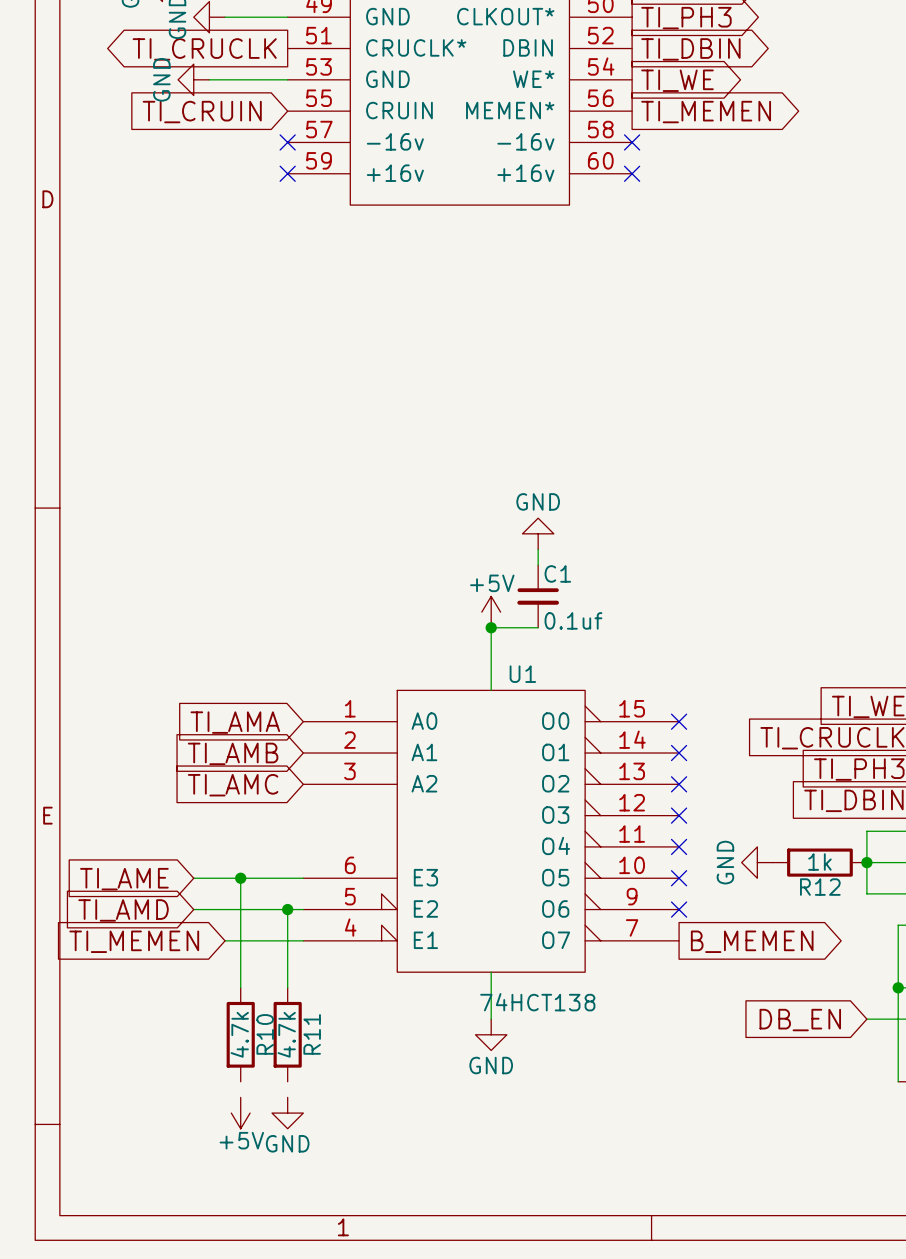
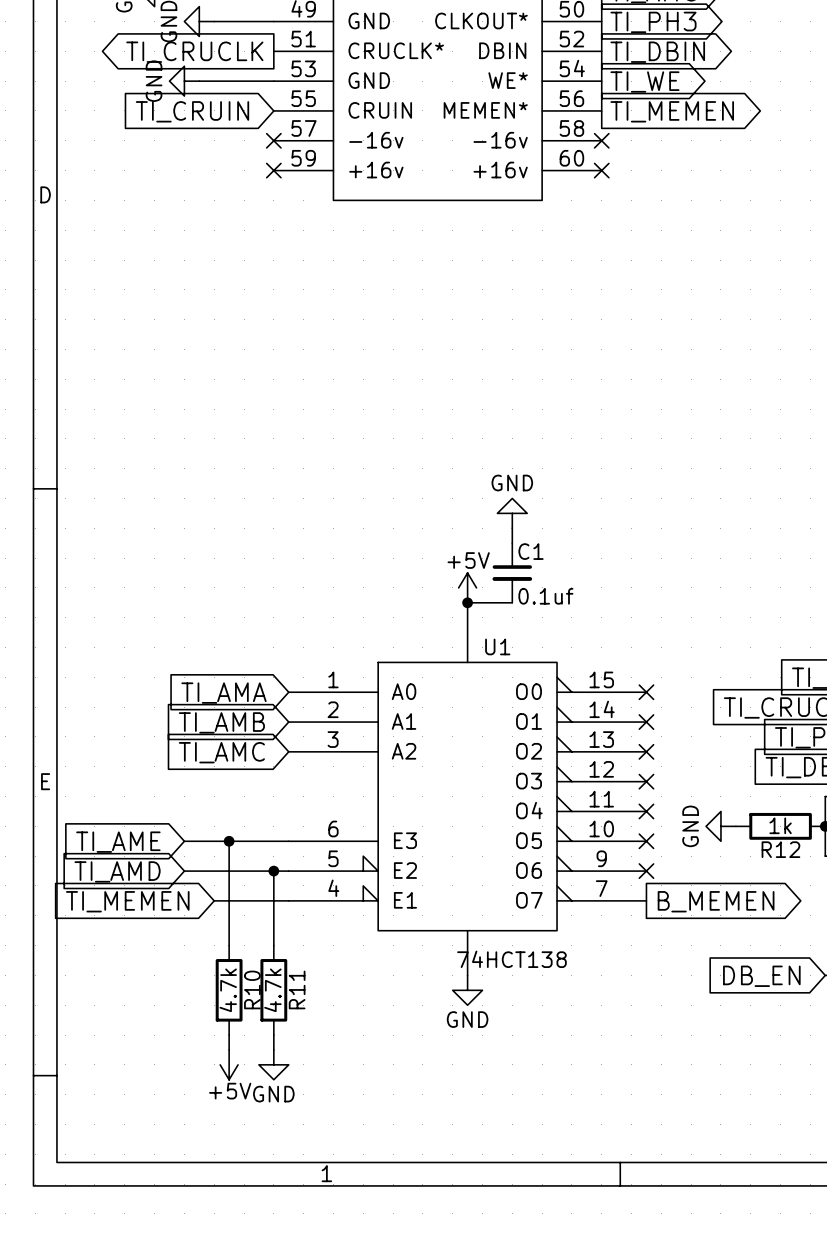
wire: none -> (229, 1035) (229, 1049)
wire: none -> (273, 1035) (273, 1049)

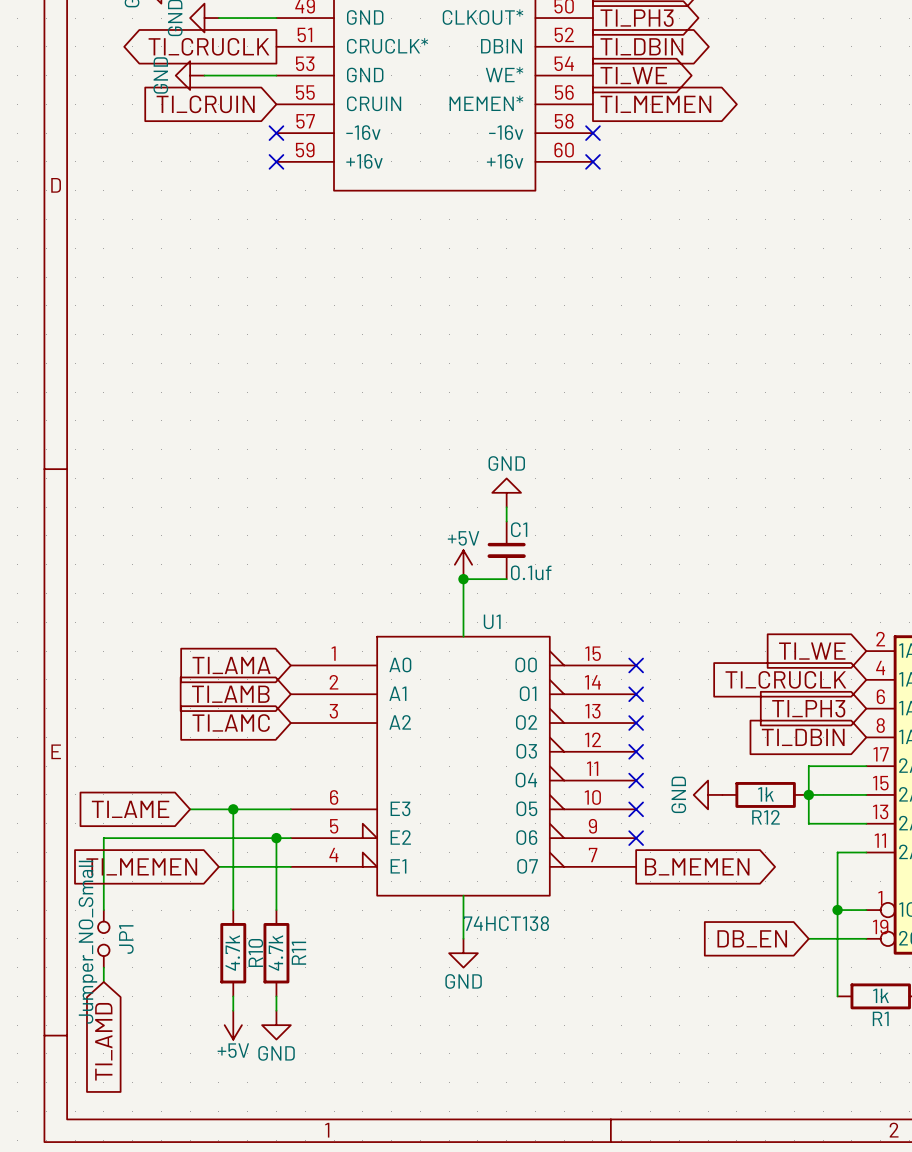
global label rotation: 0° (117, 871) -> 90° counterclockwise (103, 1041)
global label position: TI_AMD (117, 871) -> TI_AMD (103, 1041)
wire: none -> (190, 838) (103, 838) (103, 910)
JP1: none -> Jumper_NO_Small (103, 938)
wire: none -> (103, 967) (103, 982)

